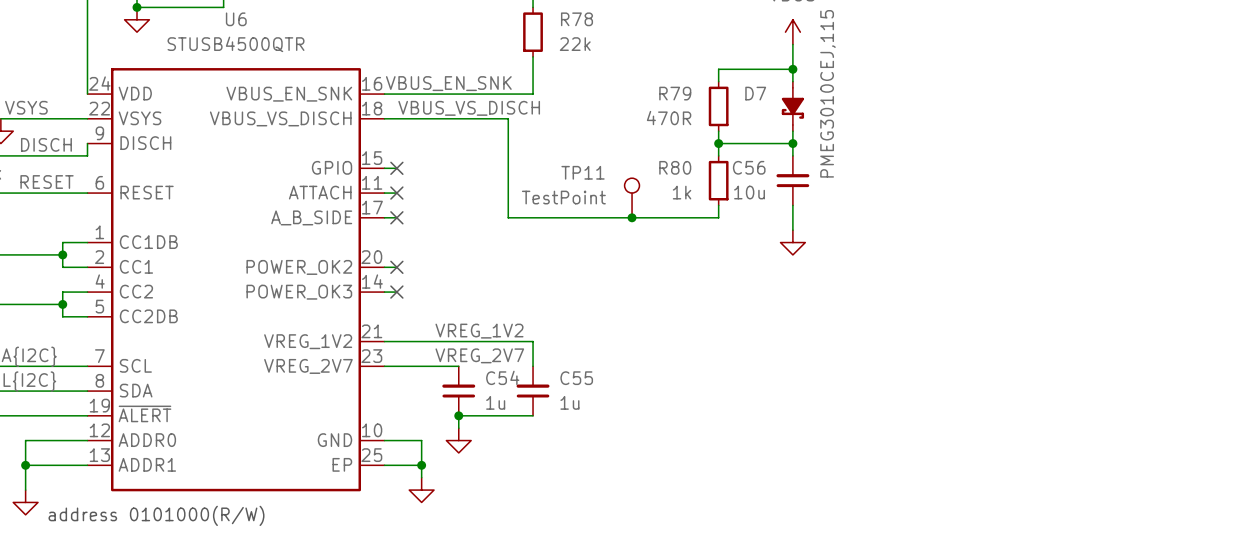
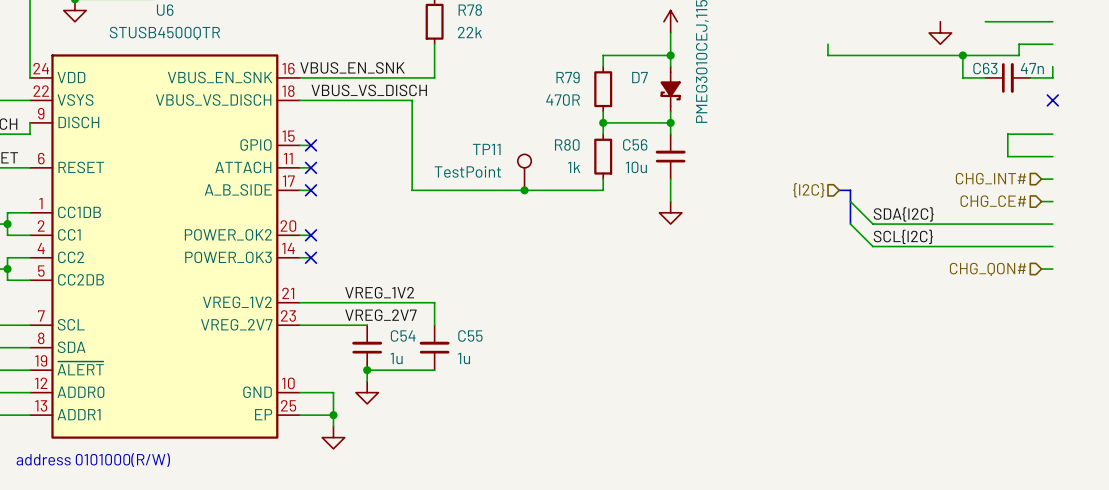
wire: none -> (985, 21) (1052, 21)
power symbol: none -> (940, 32)
wire: none -> (827, 44) (827, 55) (1019, 55) (1019, 44) (1052, 44)
wire: none -> (962, 55) (962, 77) (985, 77)
junction: none -> (962, 55)
wire: none -> (1052, 66) (1052, 77) (1030, 77)
C63: none -> (1007, 77)
no-connect mark: none -> (1052, 100)
wire: none -> (1052, 134) (1007, 134) (1007, 156) (1052, 156)
hierarchical label: none -> CHG_INT# (990, 178)
wire: none -> (1041, 179) (1052, 179)
bus: none -> (839, 190) (850, 190) (850, 224)
hierarchical label: none -> {I2C} (808, 190)
wire: none -> (850, 201) (872, 224) (1052, 224)
hierarchical label: none -> CHG_CE# (993, 201)
wire: none -> (1041, 201) (1052, 201)
label: none -> SDA{I2C} (903, 214)
wire: none -> (850, 224) (872, 246) (1052, 246)
label: none -> SCL{I2C} (903, 236)
hierarchical label: none -> CHG_QON# (988, 269)
wire: none -> (1041, 269) (1052, 269)

